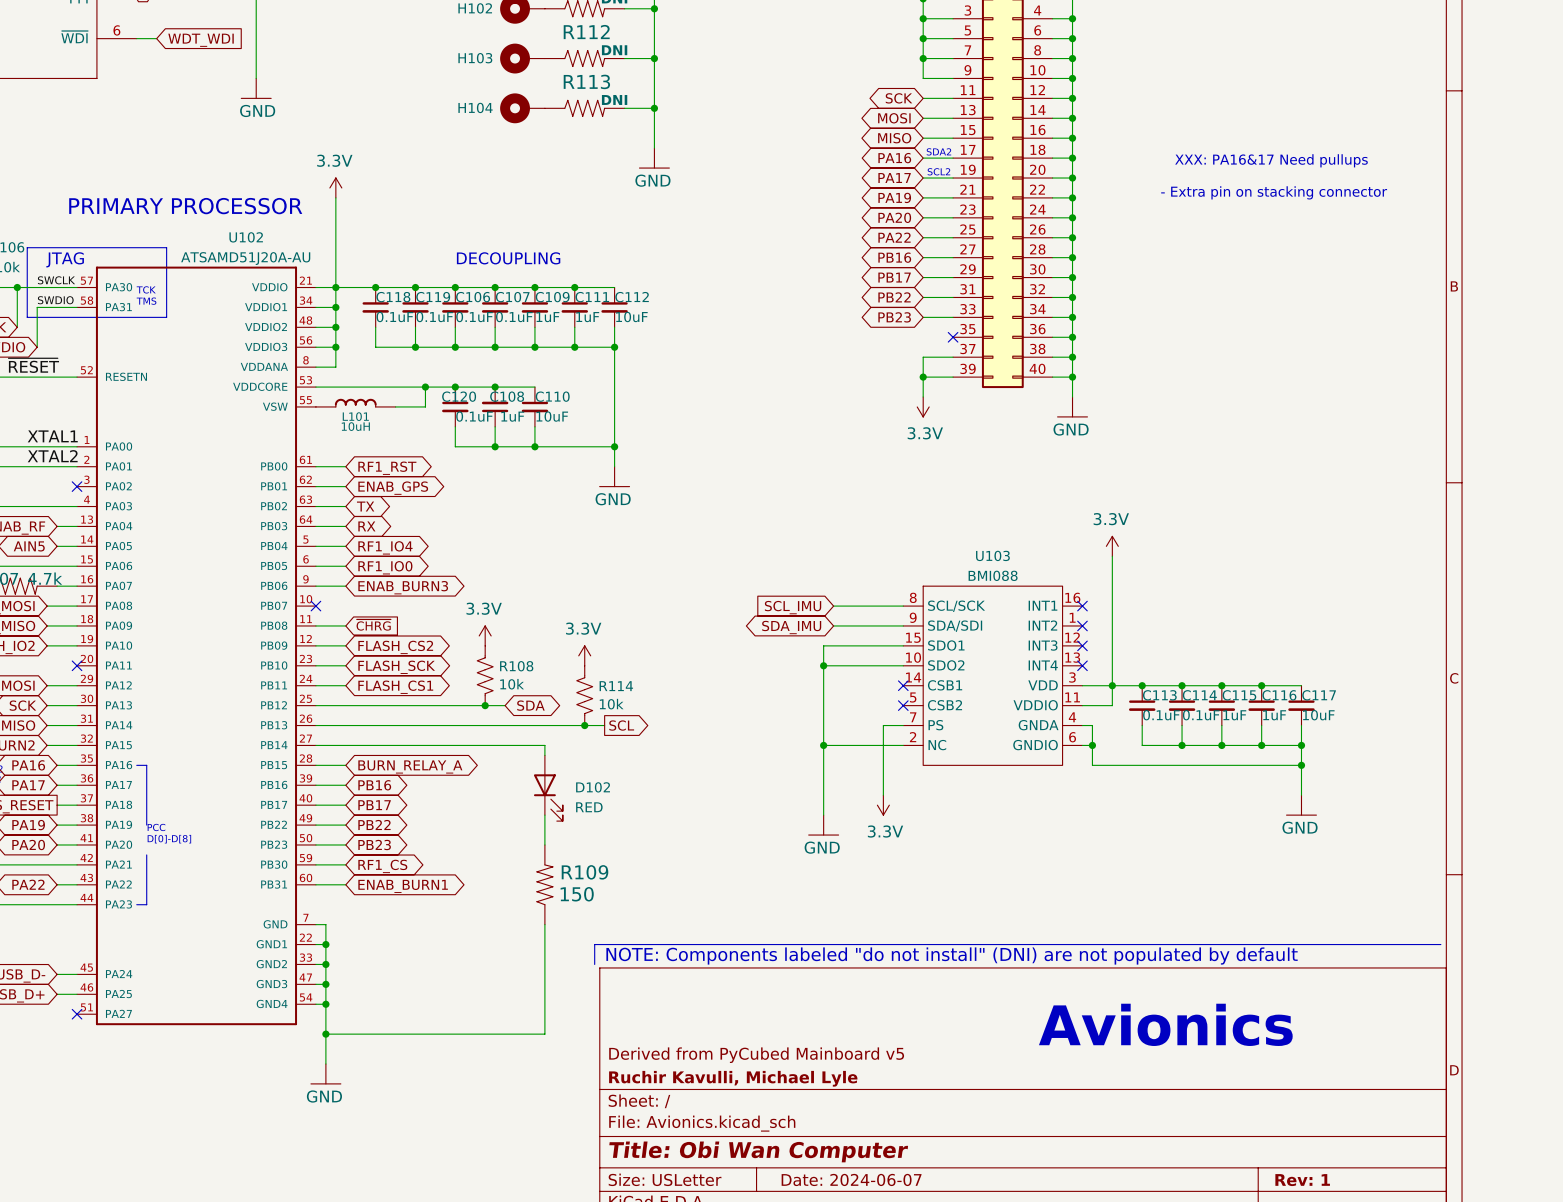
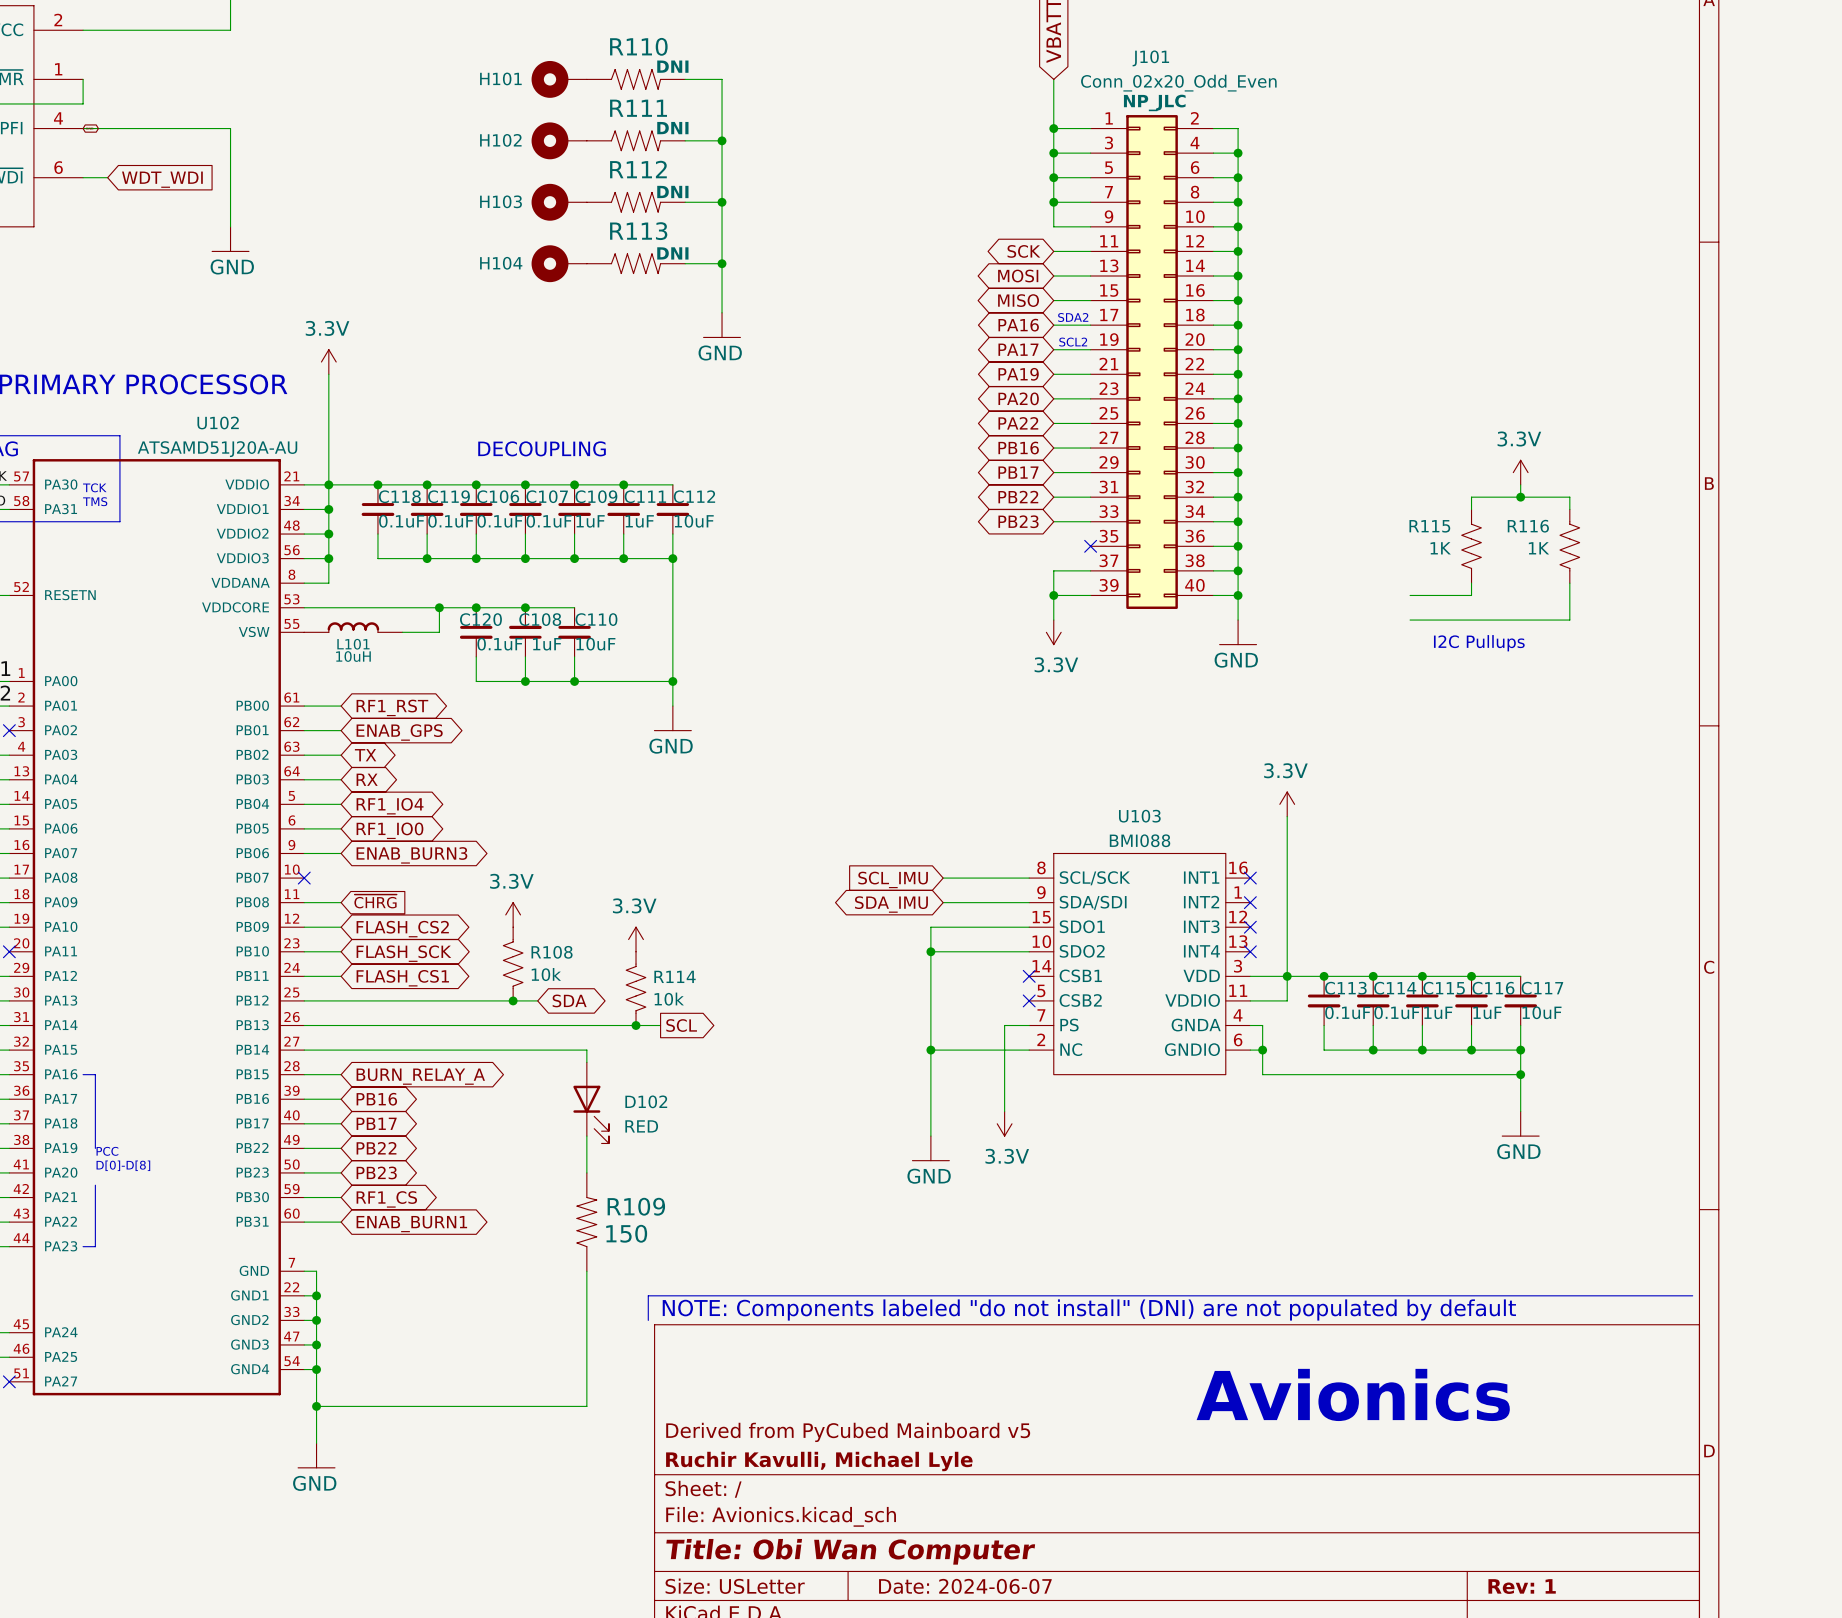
text: XXX: PA16&17 Need pullups (1271, 160) -> none
text: - Extra pin on stacking connector (1274, 192) -> none
power symbol: none -> 3.3V (1520, 472)
wire: none -> (1520, 484) (1520, 497)
junction: none -> (1520, 497)
wire: none -> (1471, 509) (1471, 497) (1569, 497) (1569, 509)
R115: none -> 1K (1471, 546)
R116: none -> 1K (1569, 546)
wire: none -> (1471, 583) (1471, 595) (1410, 595)
wire: none -> (1569, 583) (1569, 620) (1410, 620)
text: none -> I2C Pullups (1479, 643)

